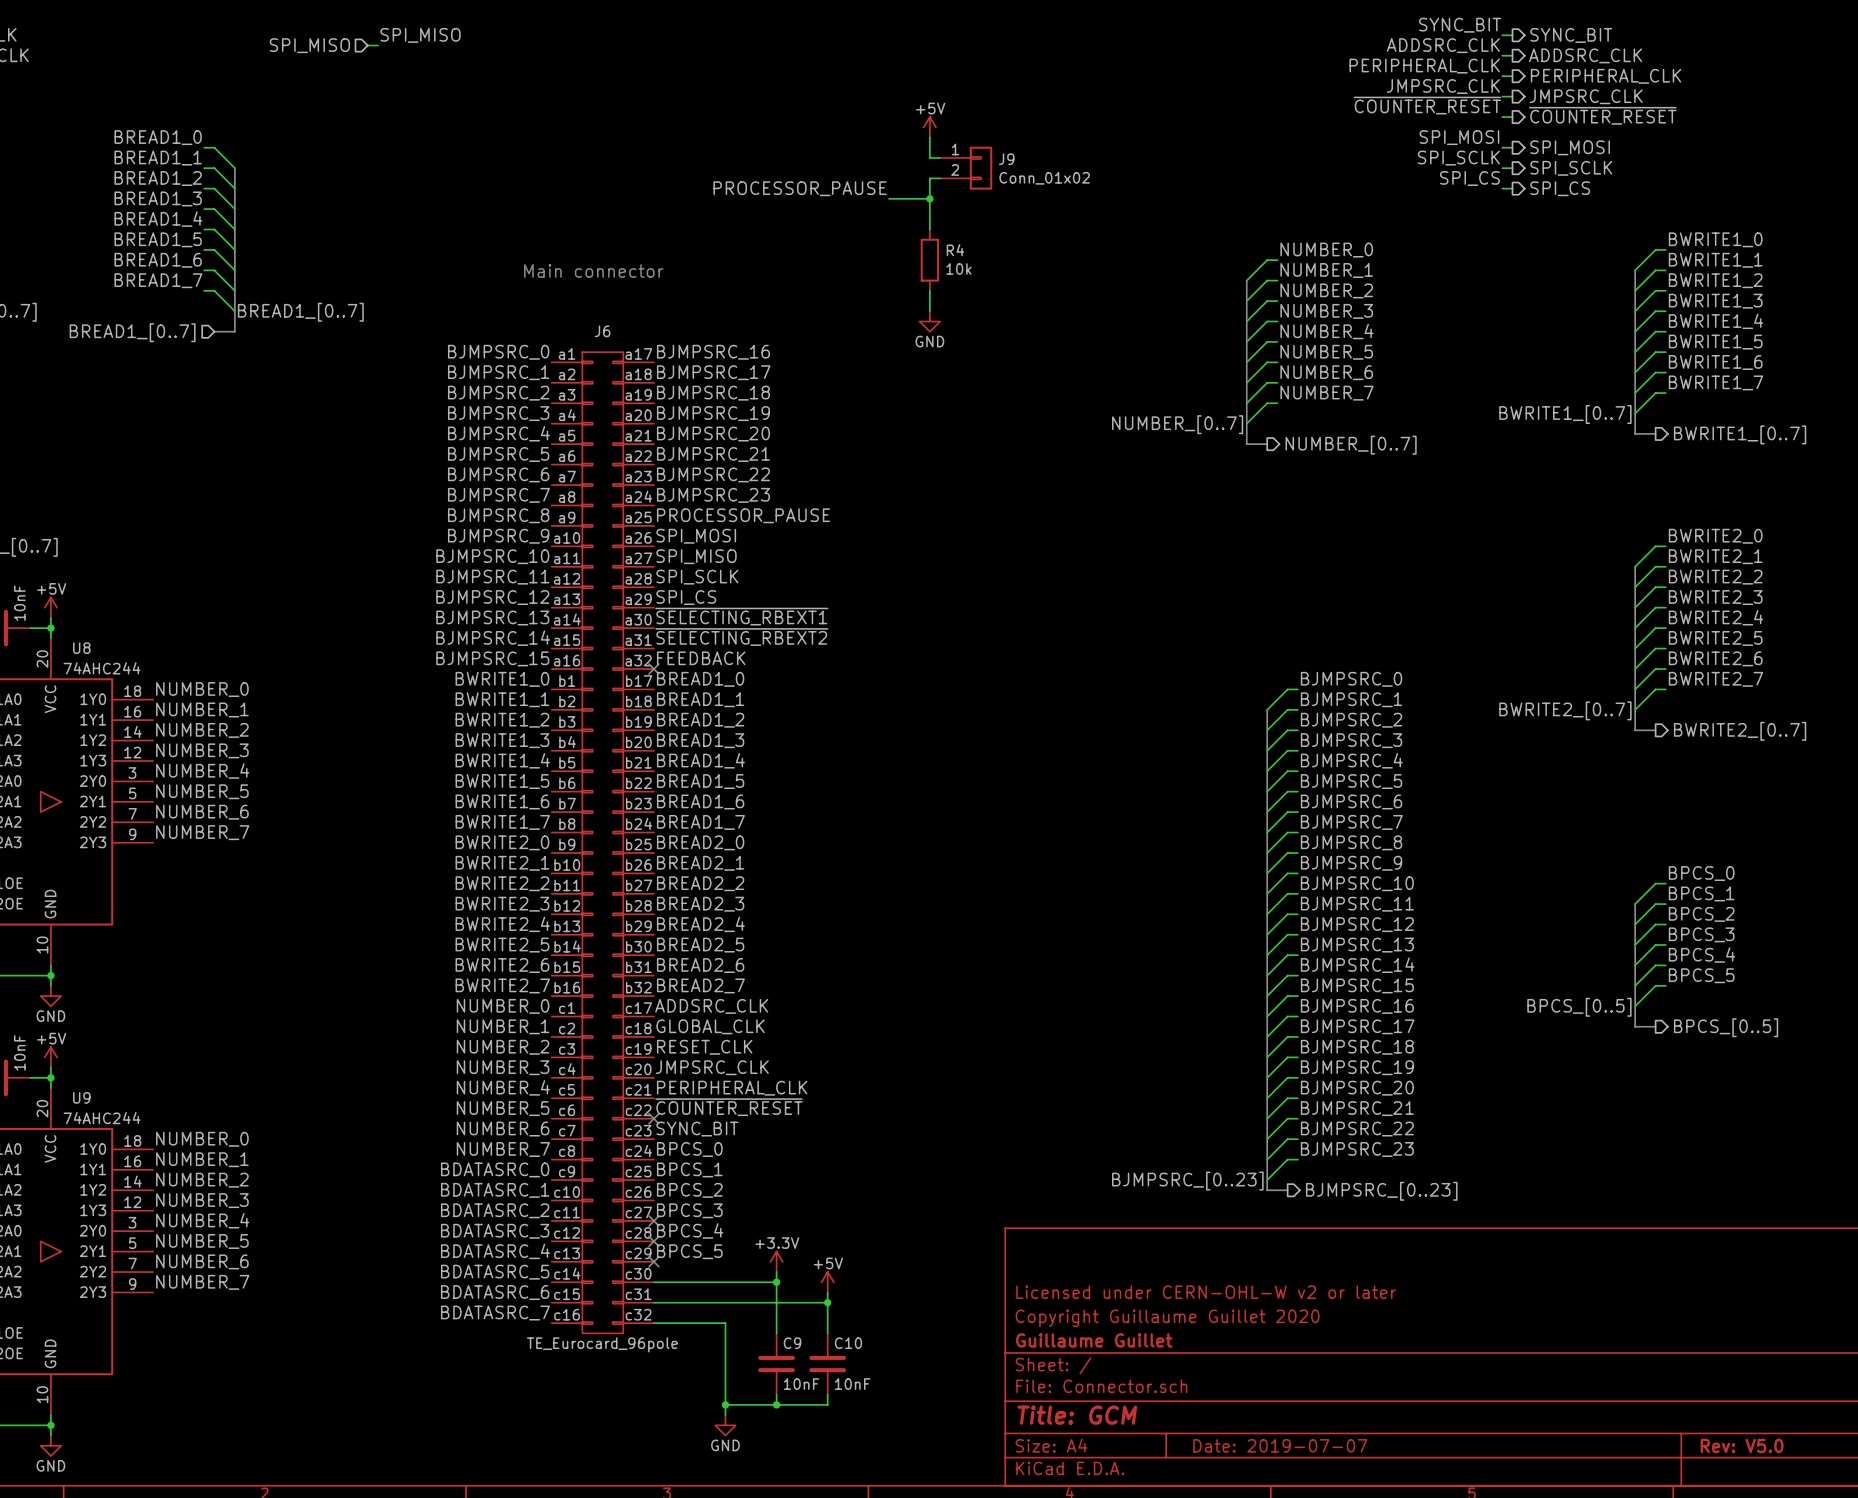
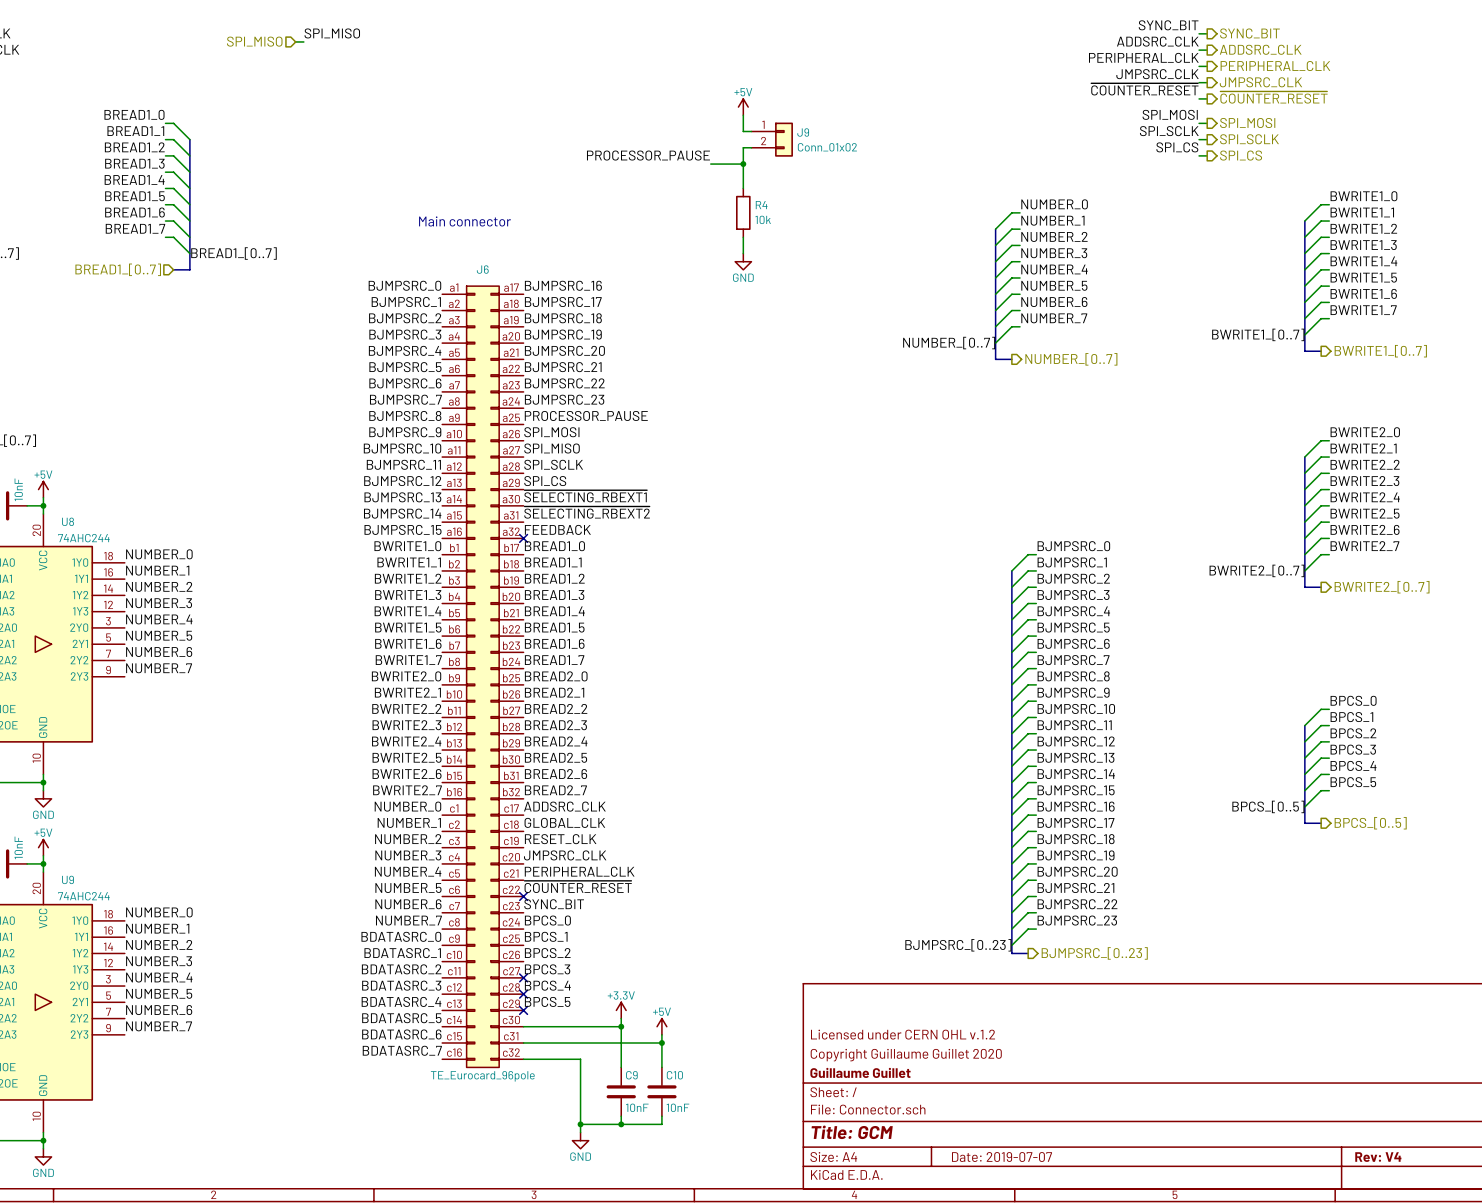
title block: Licensed under CERN-OHL-W v2 or later (1206, 1292) -> Licensed under CERN OHL v.1.2 (903, 1034)
title block: Rev: V5.0 (1742, 1445) -> Rev: V4 (1378, 1157)

